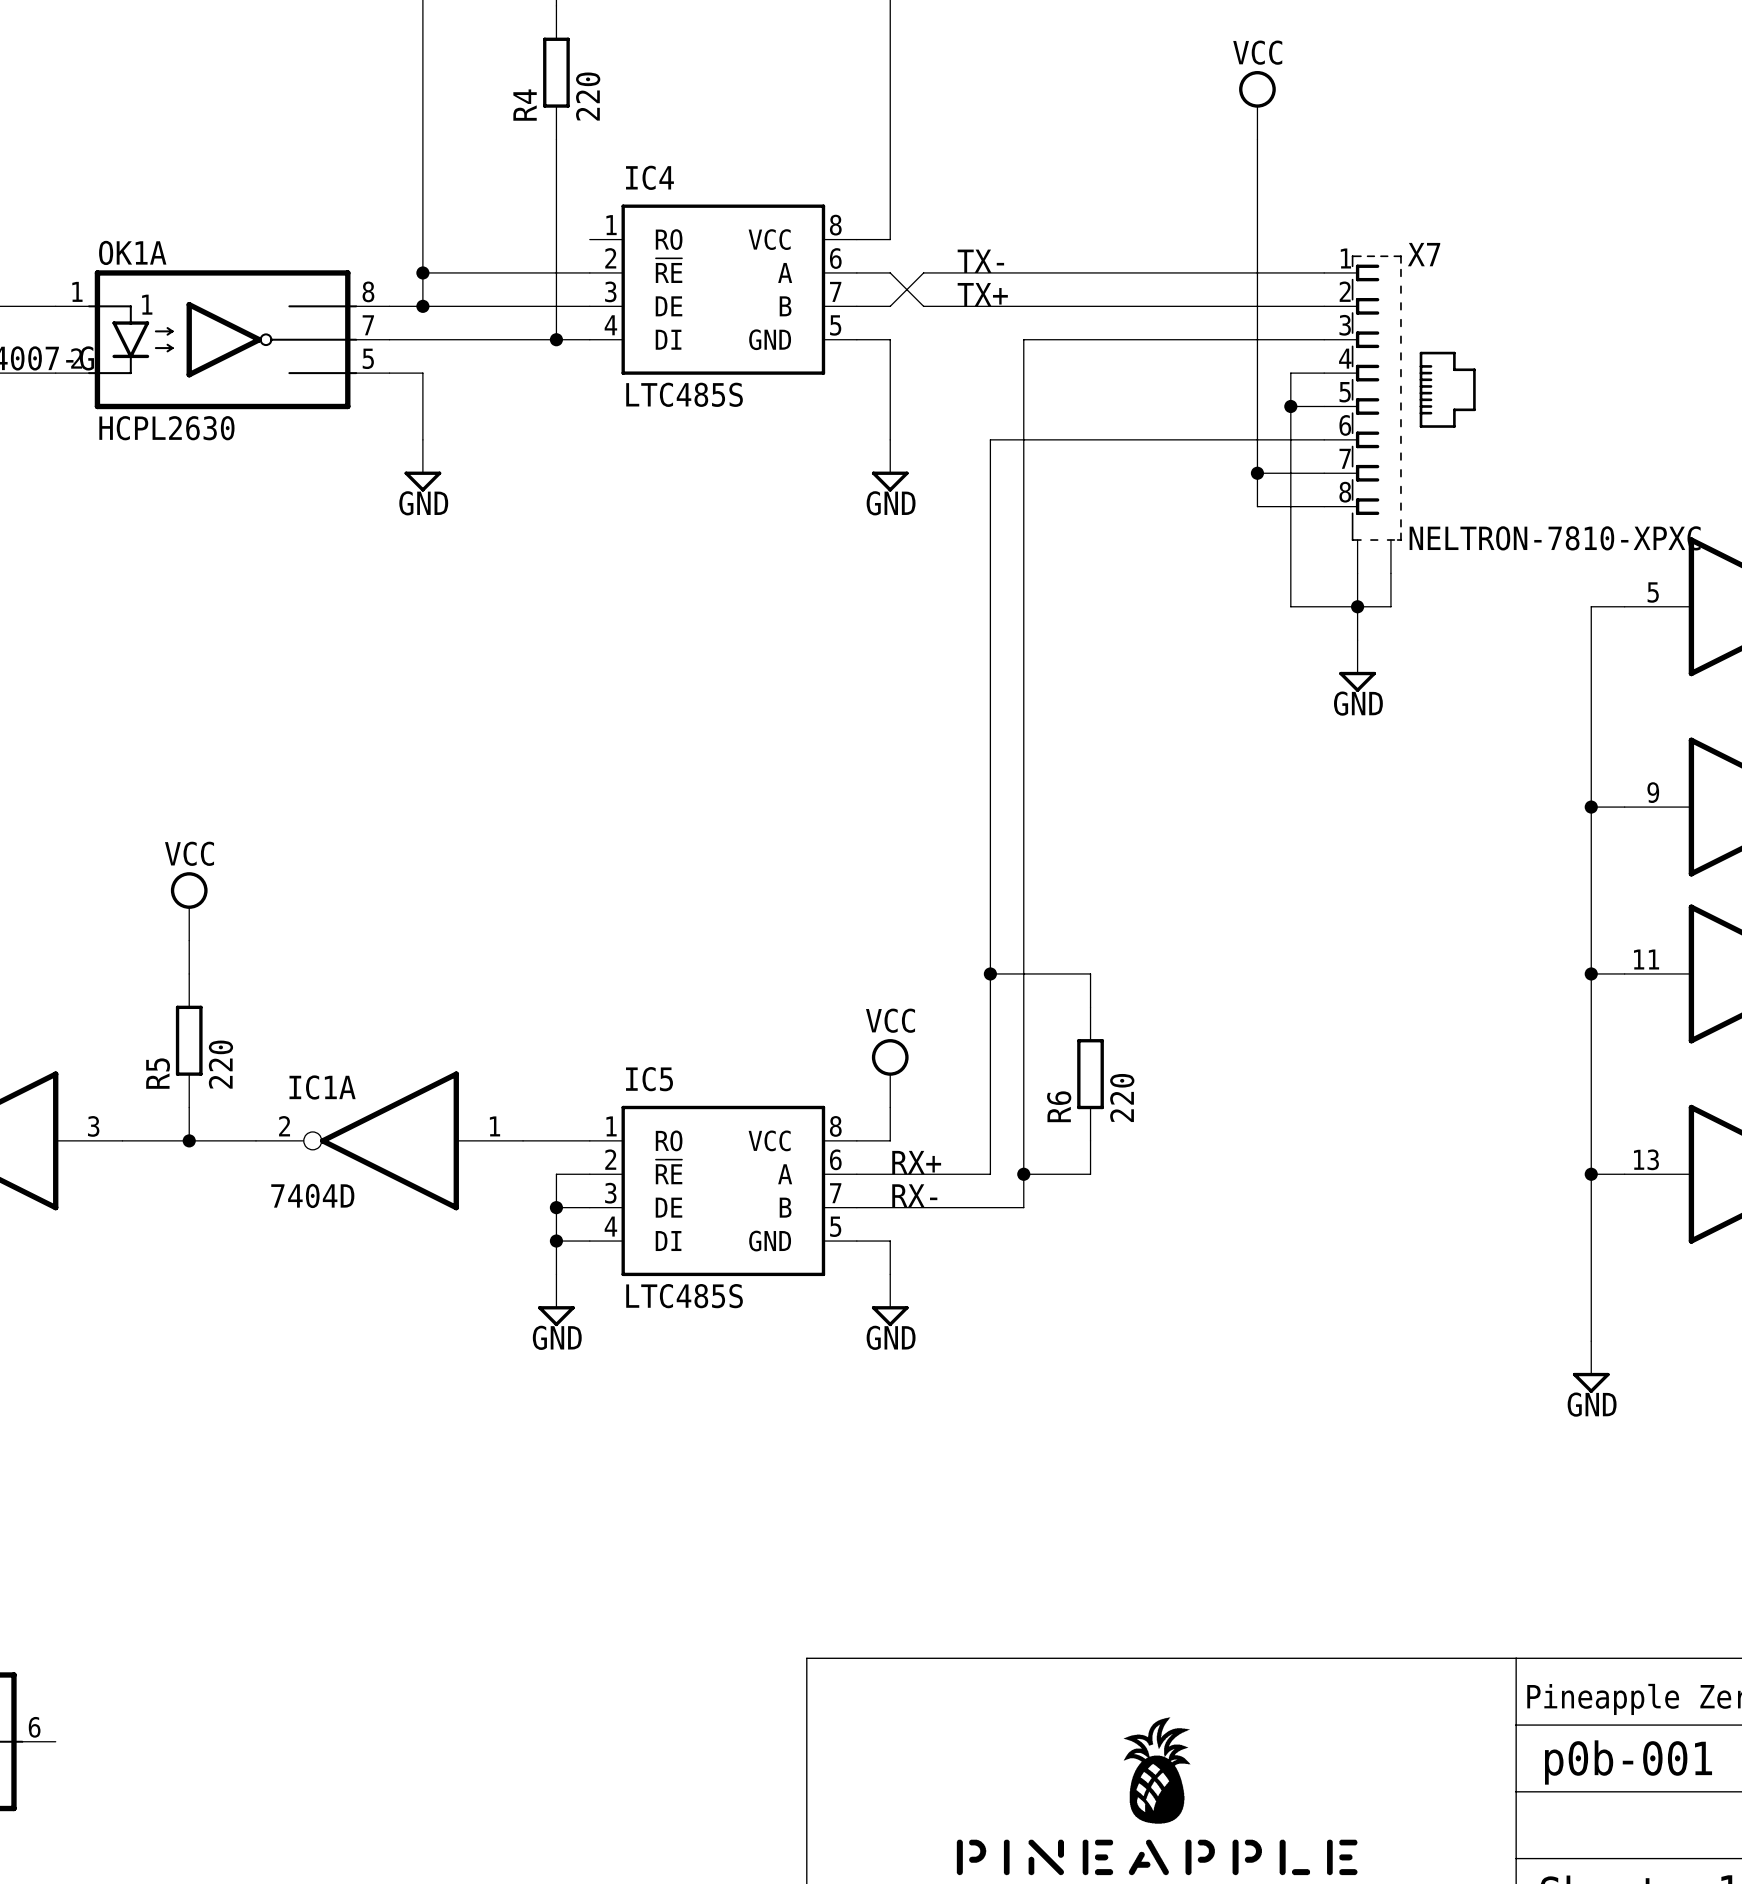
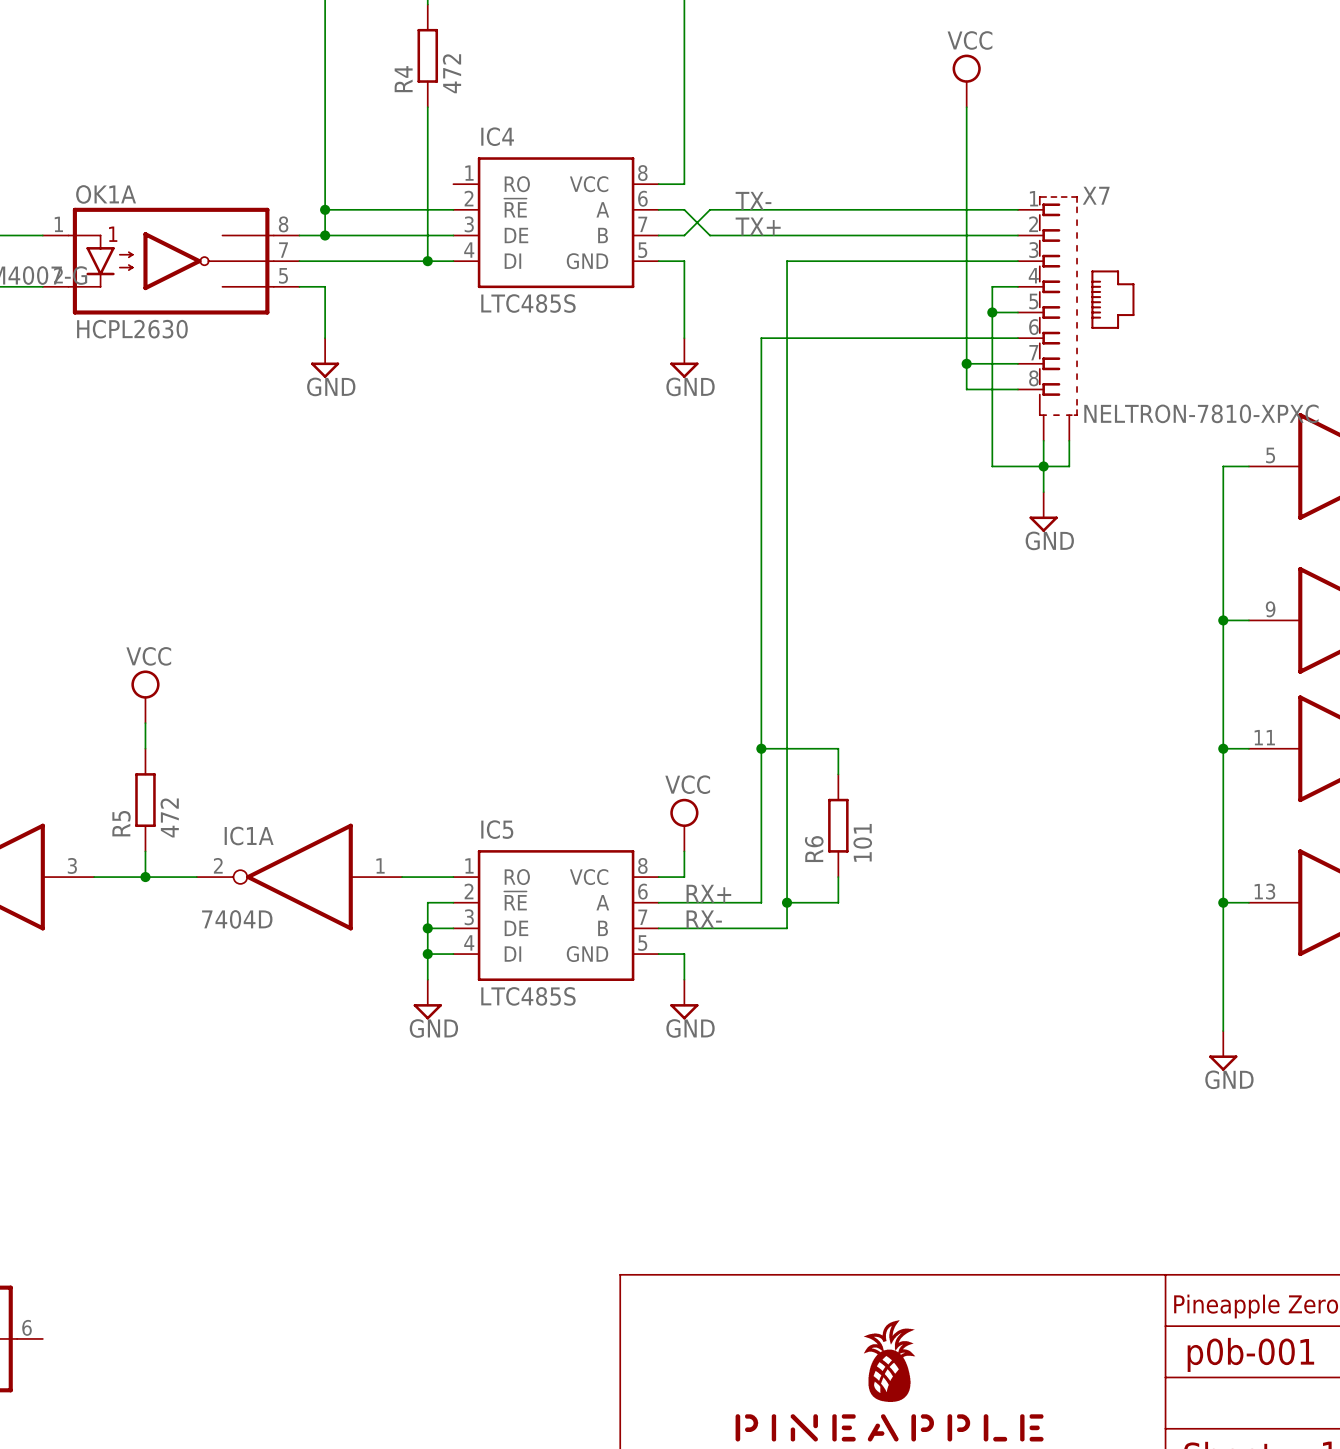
R4 value: 220 (588, 96) -> 472 (451, 73)
R5 value: 220 (220, 1064) -> 472 (169, 817)
R6 value: 220 (1122, 1098) -> 101 (862, 842)

